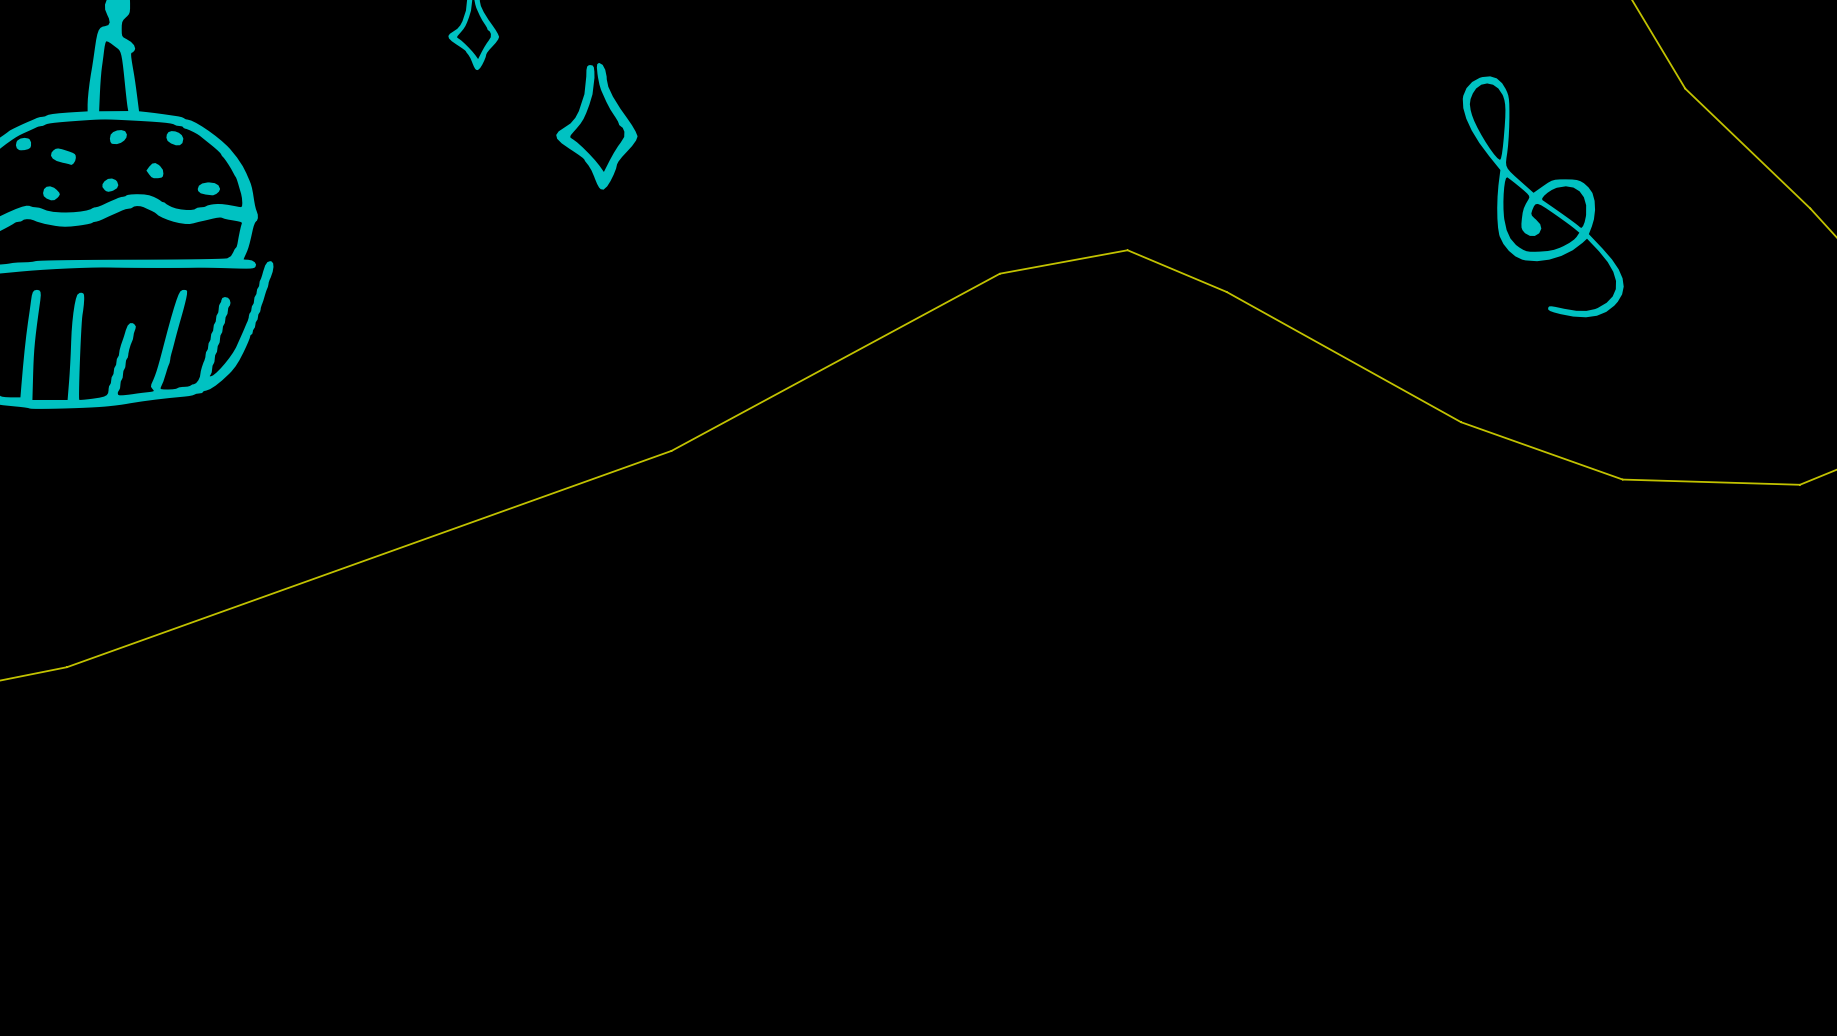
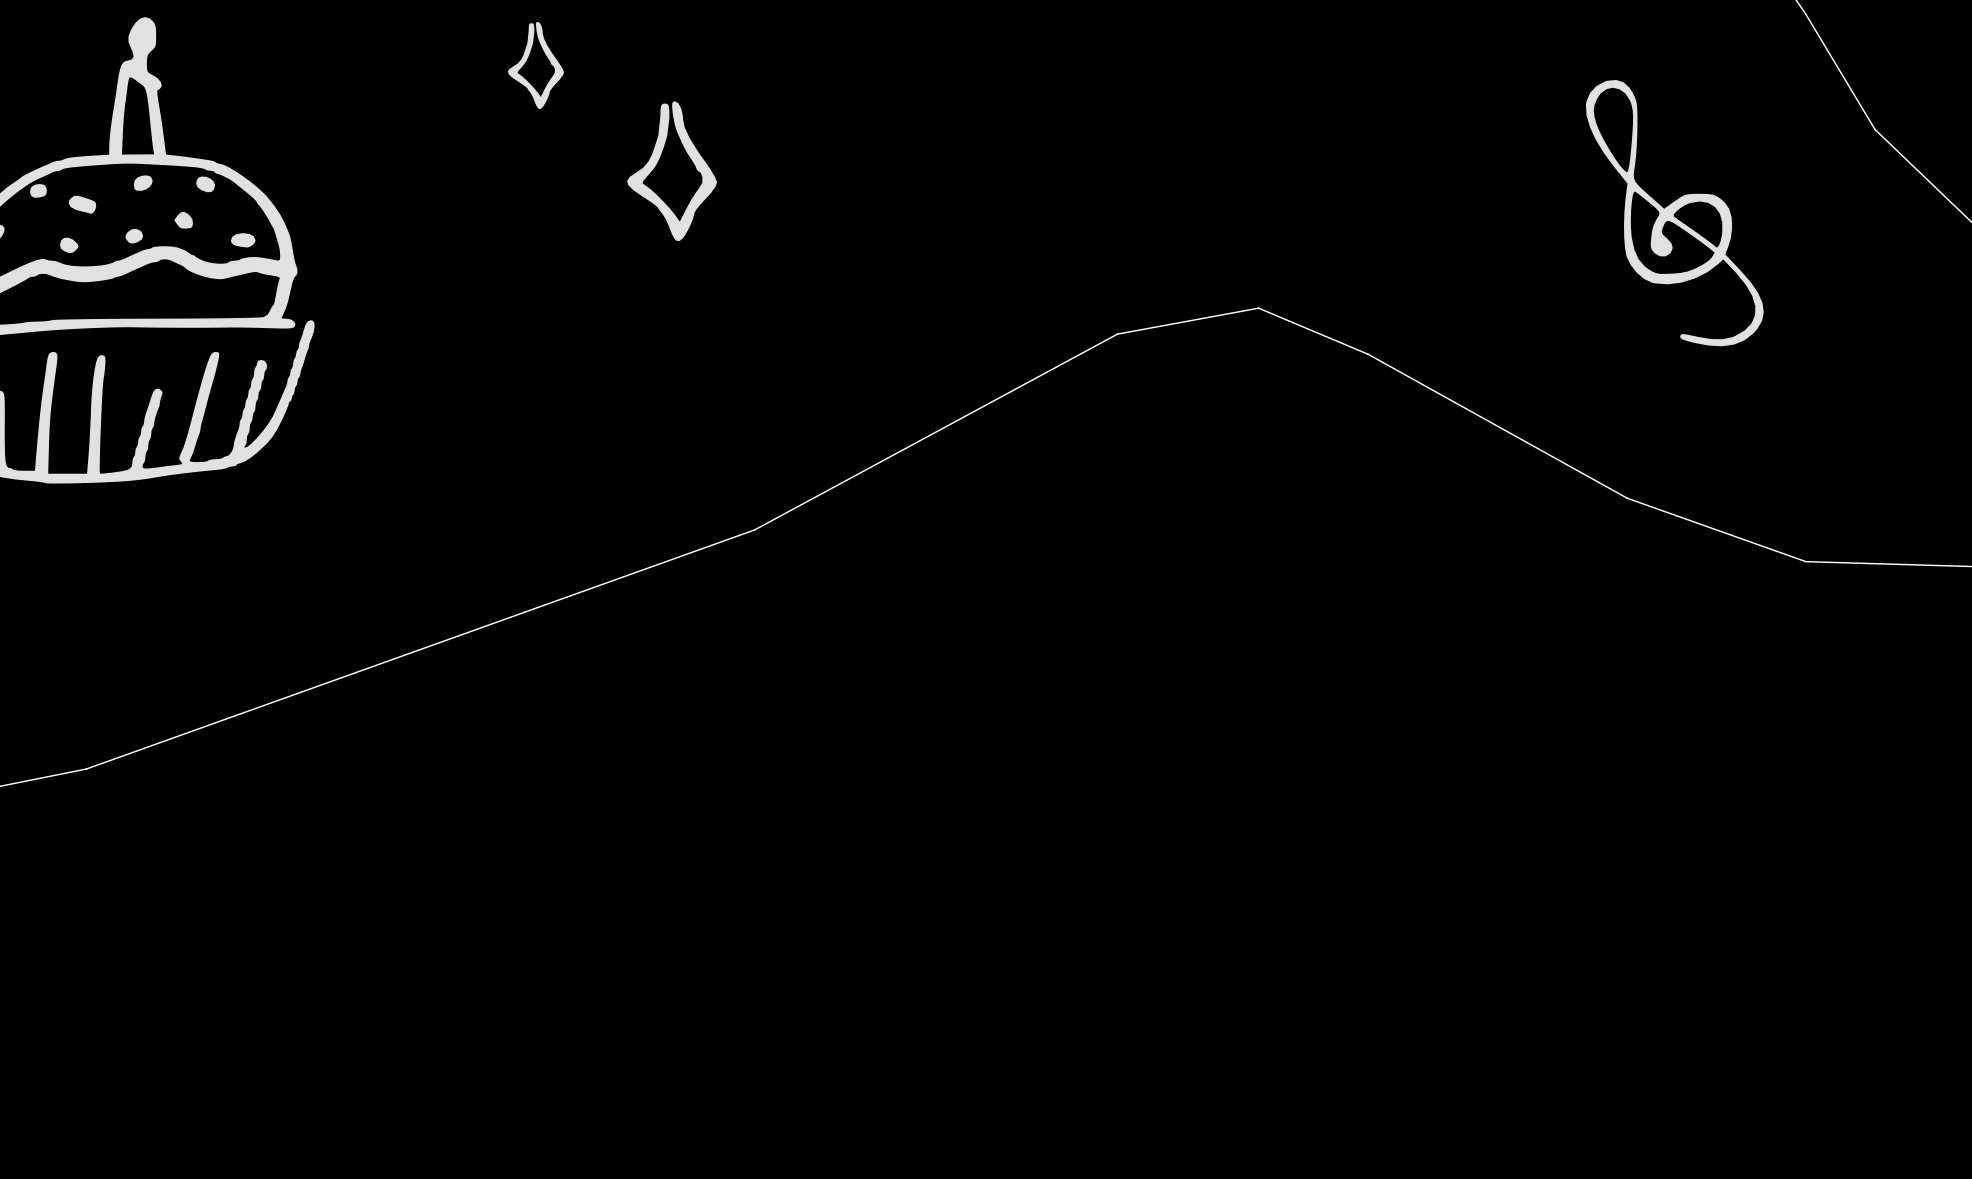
drawing position: (1543, 196) -> (1674, 213)

